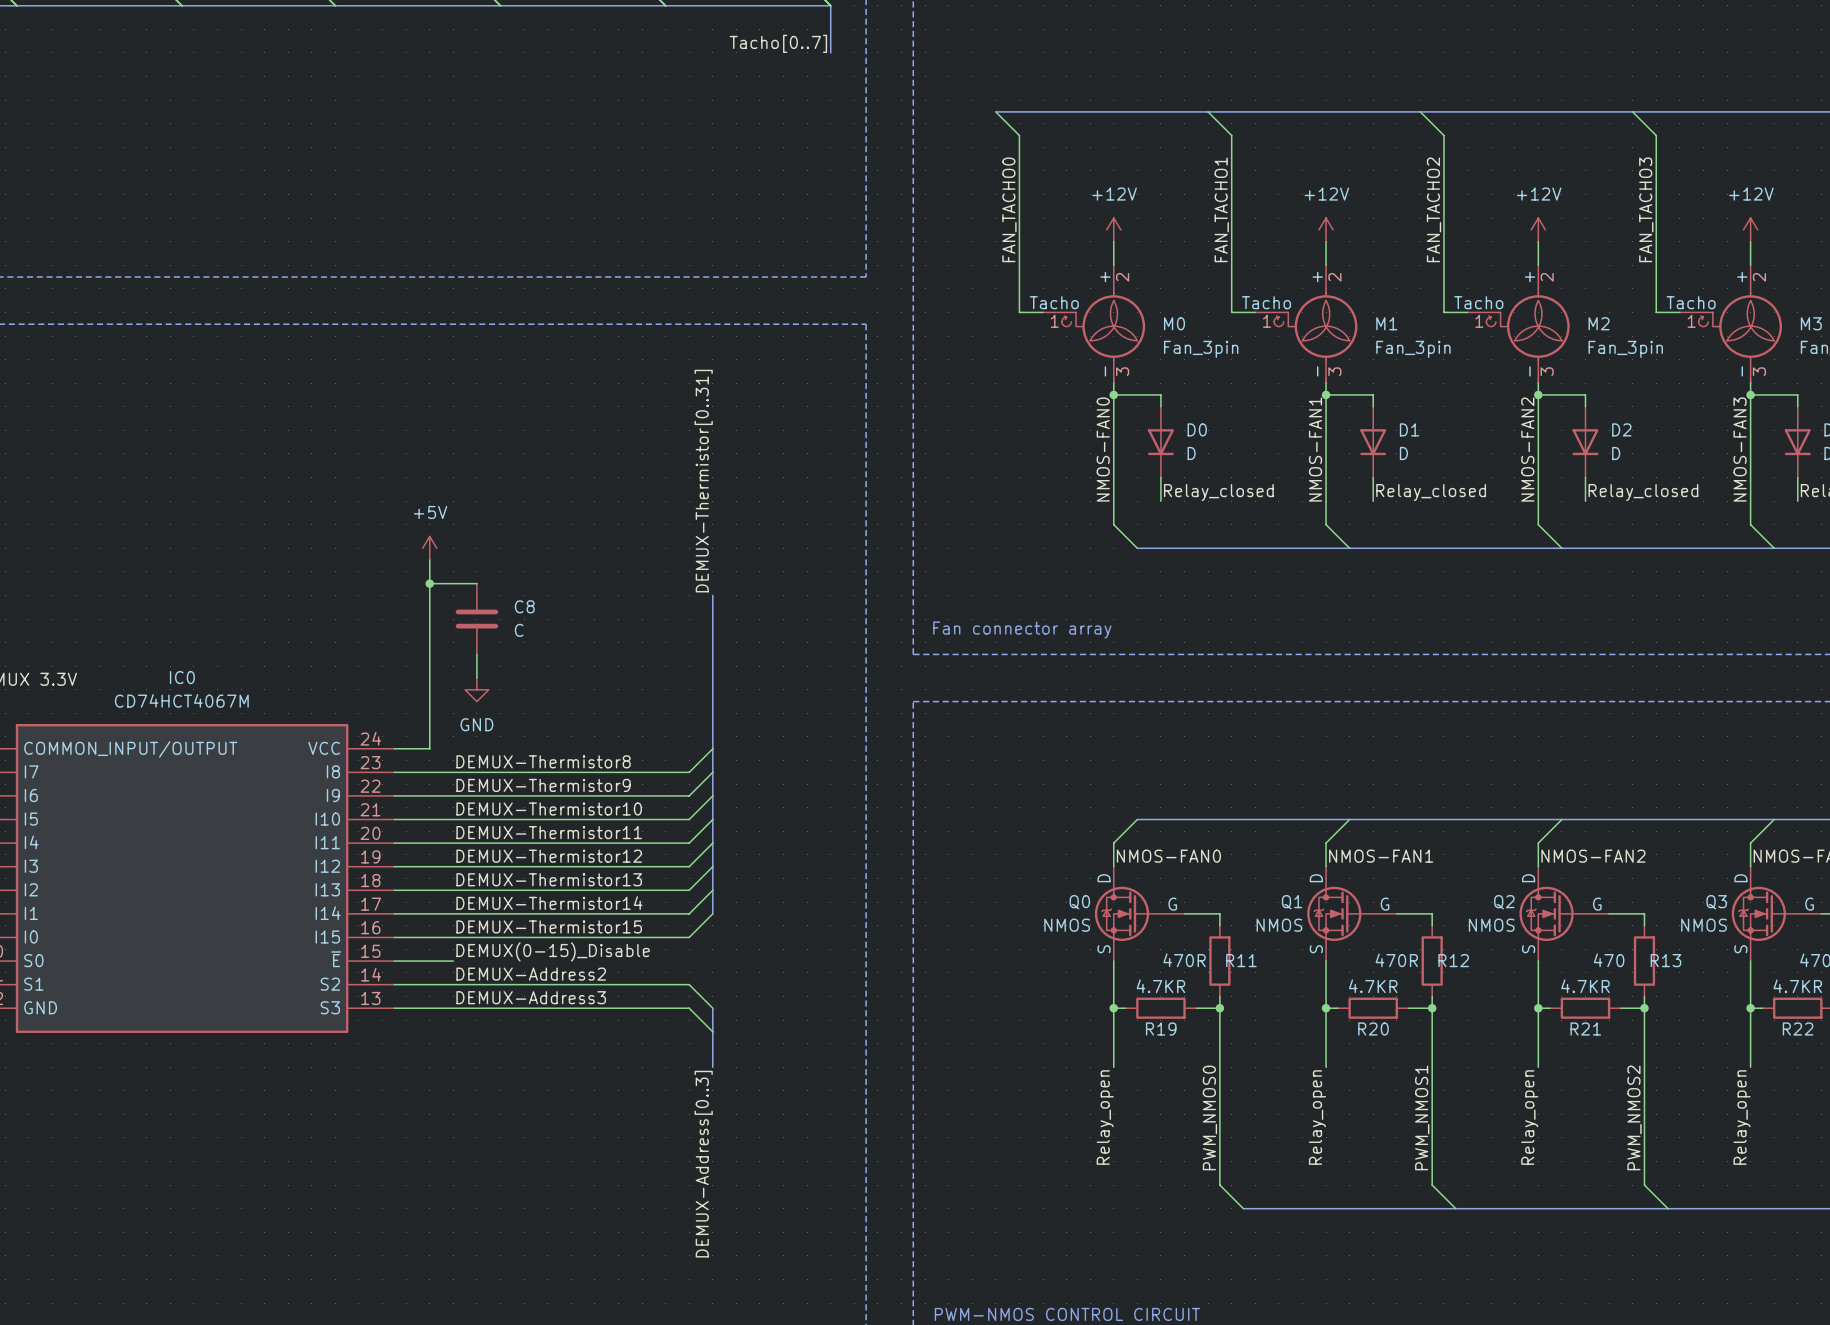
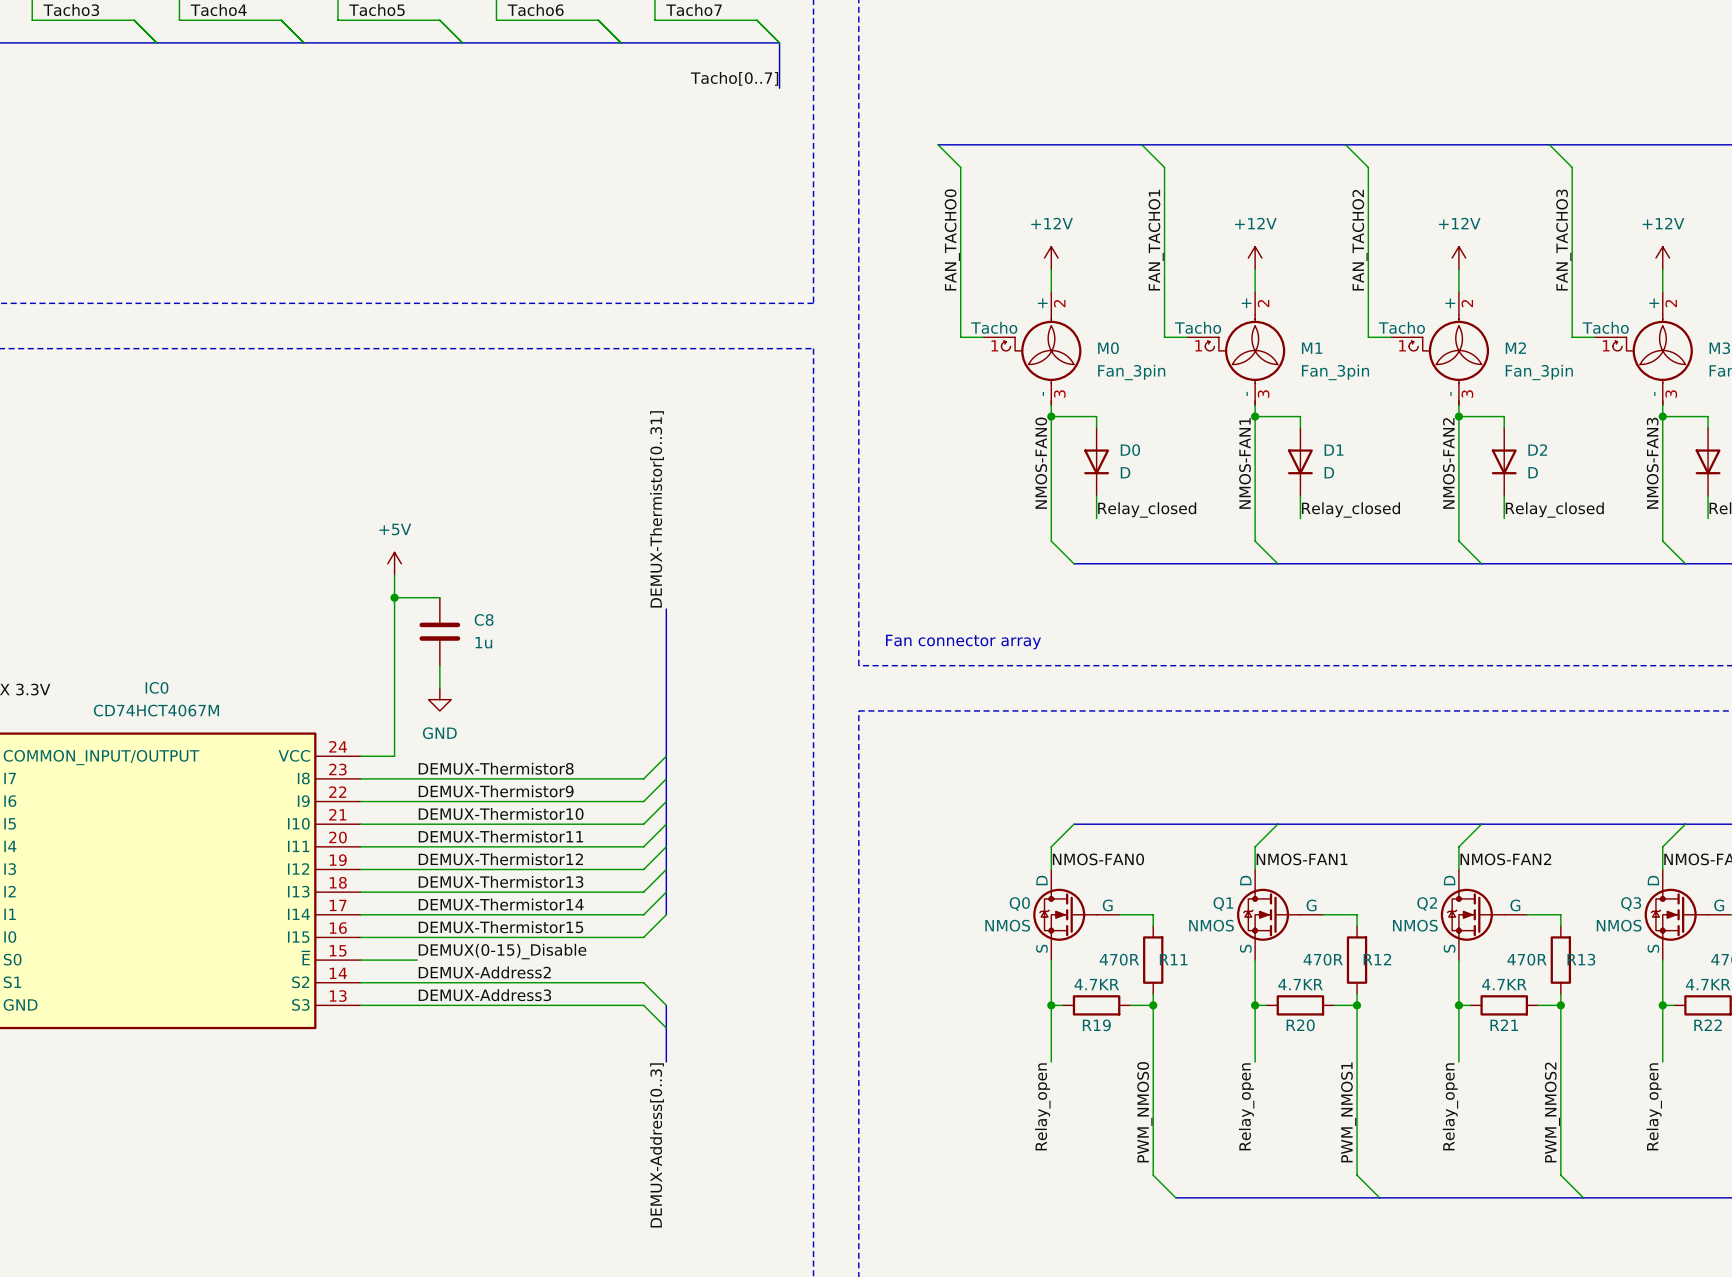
C8 value: C (519, 630) -> 1u (483, 642)
R13 value: 470 (1609, 960) -> 470R (1527, 959)

